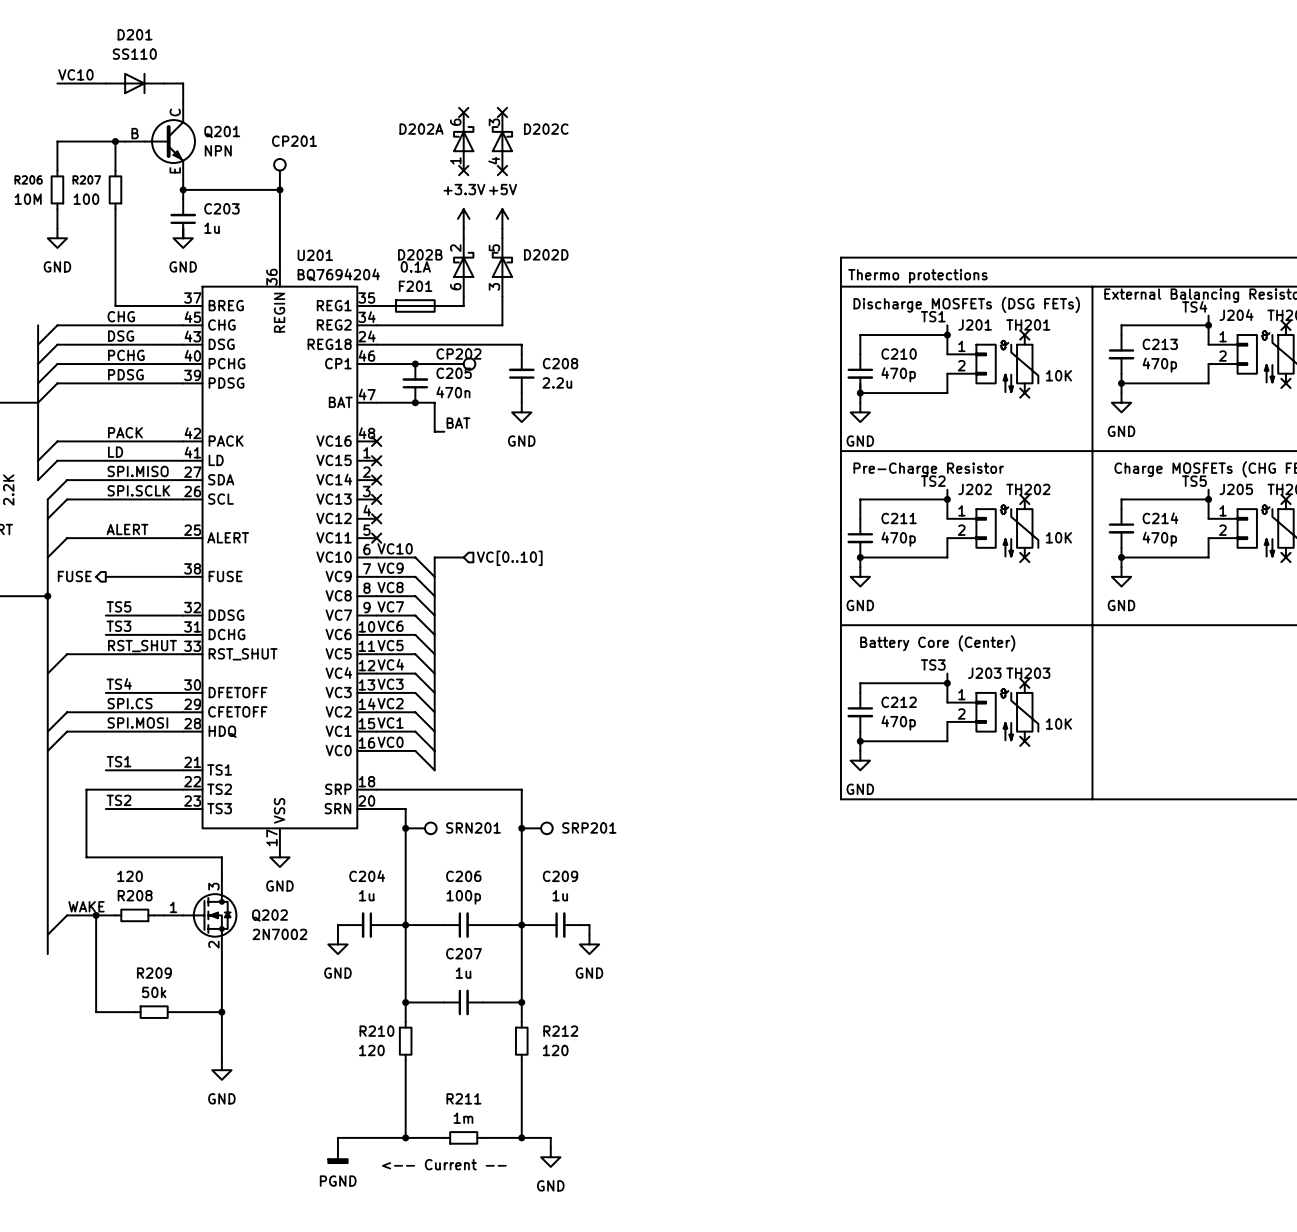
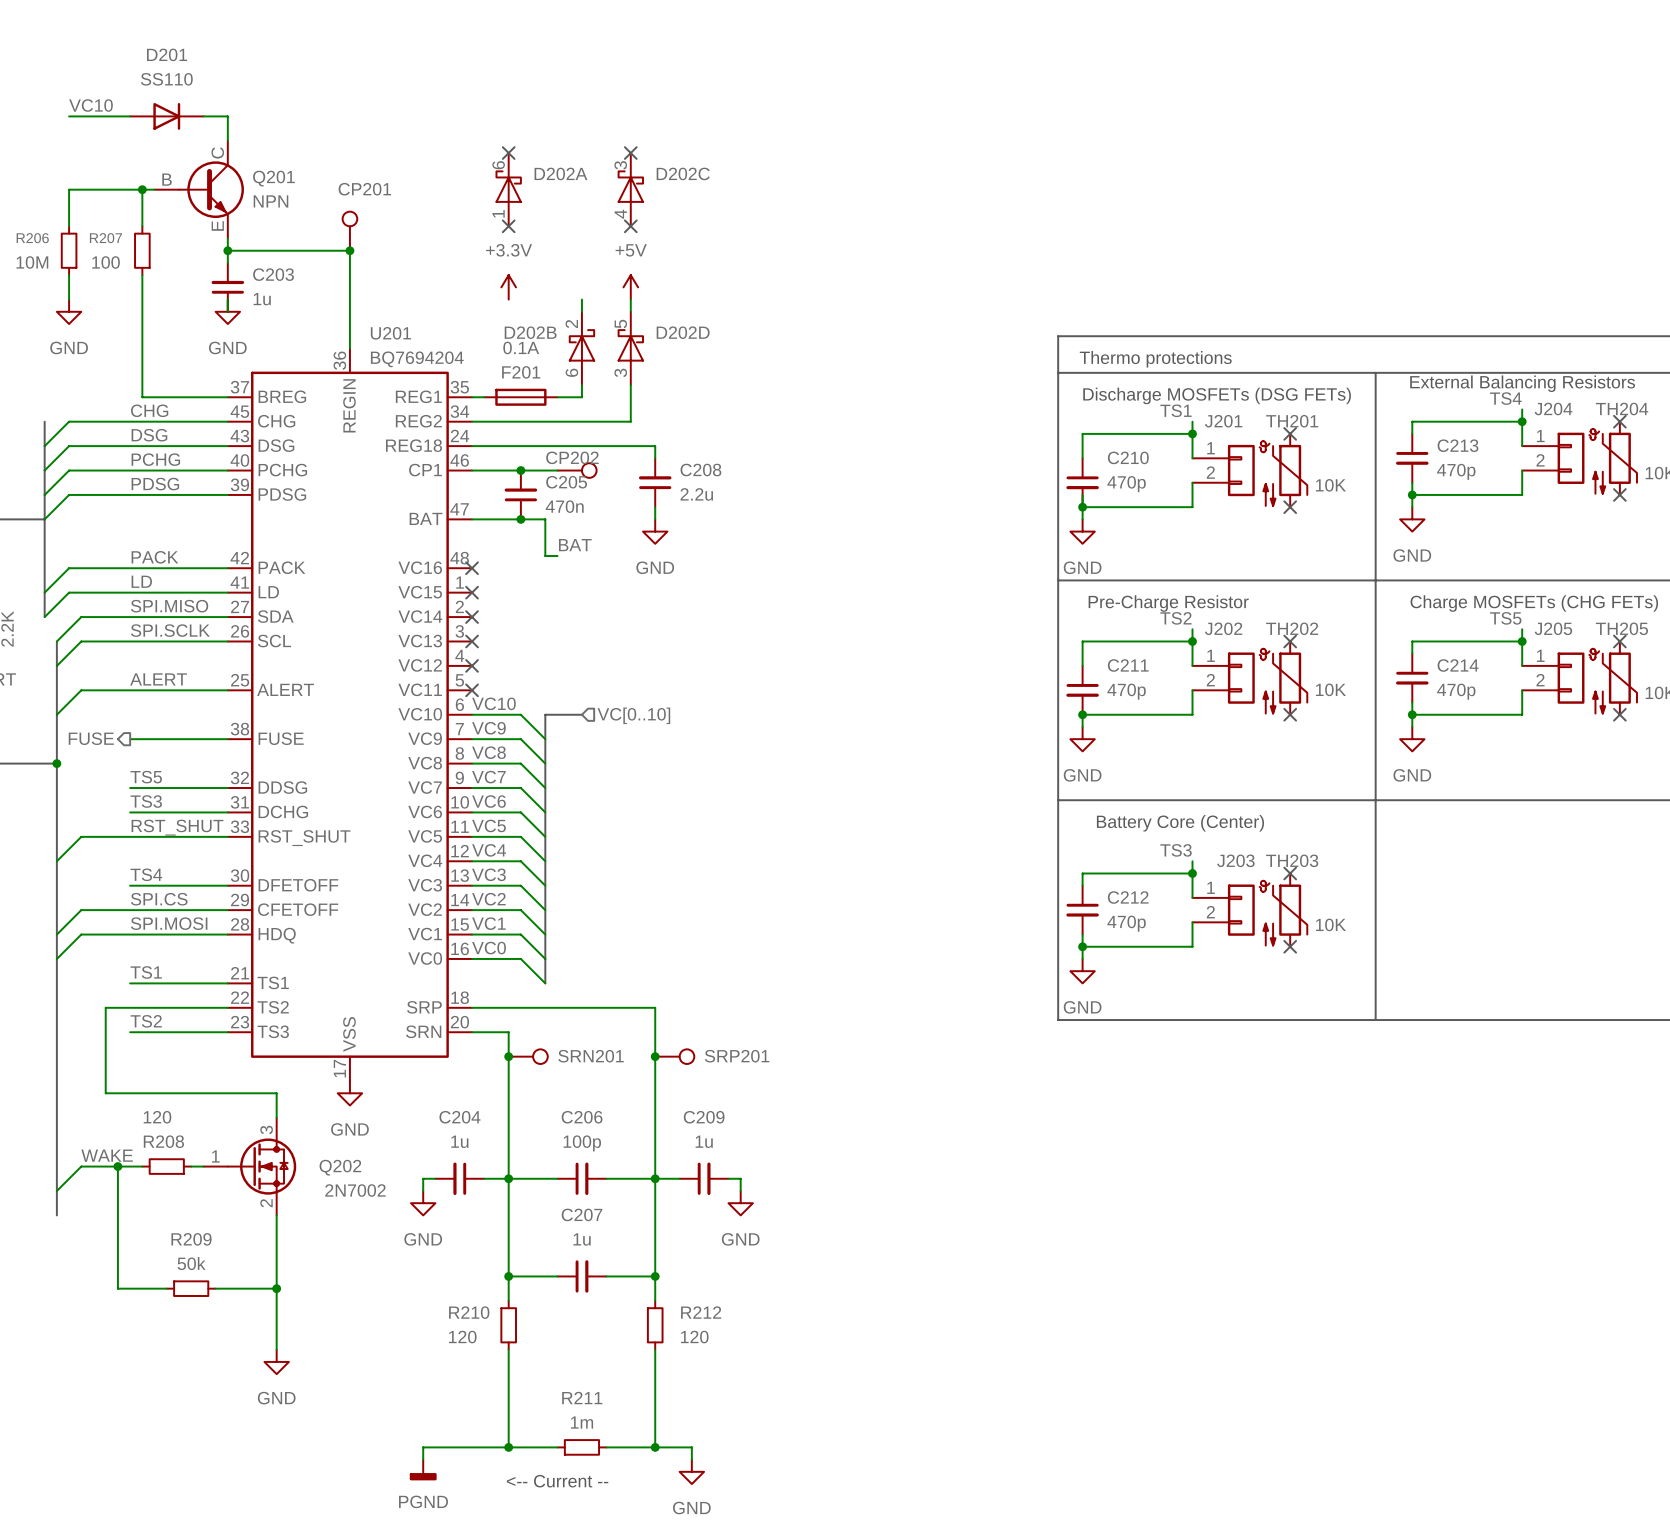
no-connect mark: none -> (508, 153)
no-connect mark: (463, 112) -> none
D202A flip: as is (463, 139) -> left-right (508, 186)
D202A position: (463, 141) -> (508, 189)
no-connect mark: none -> (508, 226)
no-connect mark: (463, 170) -> none
power symbol position: +3.3V (463, 218) -> +3.3V (508, 287)

